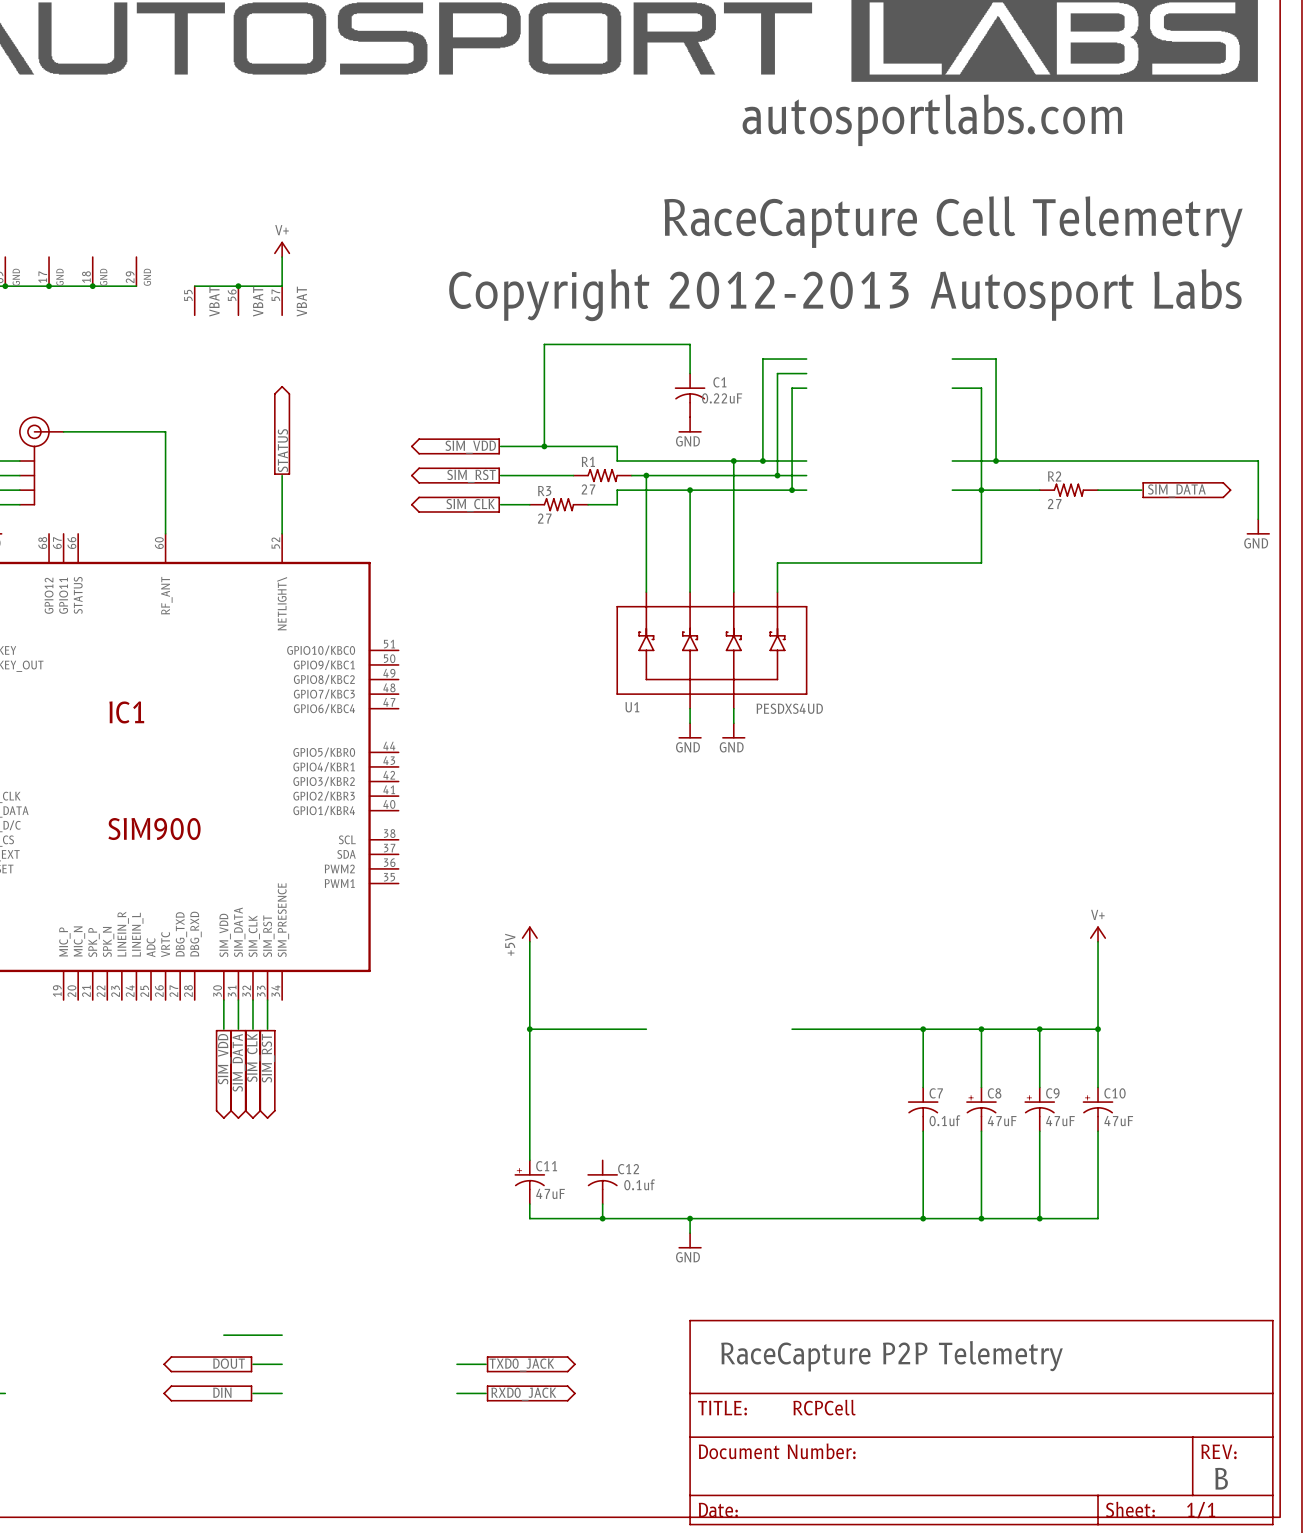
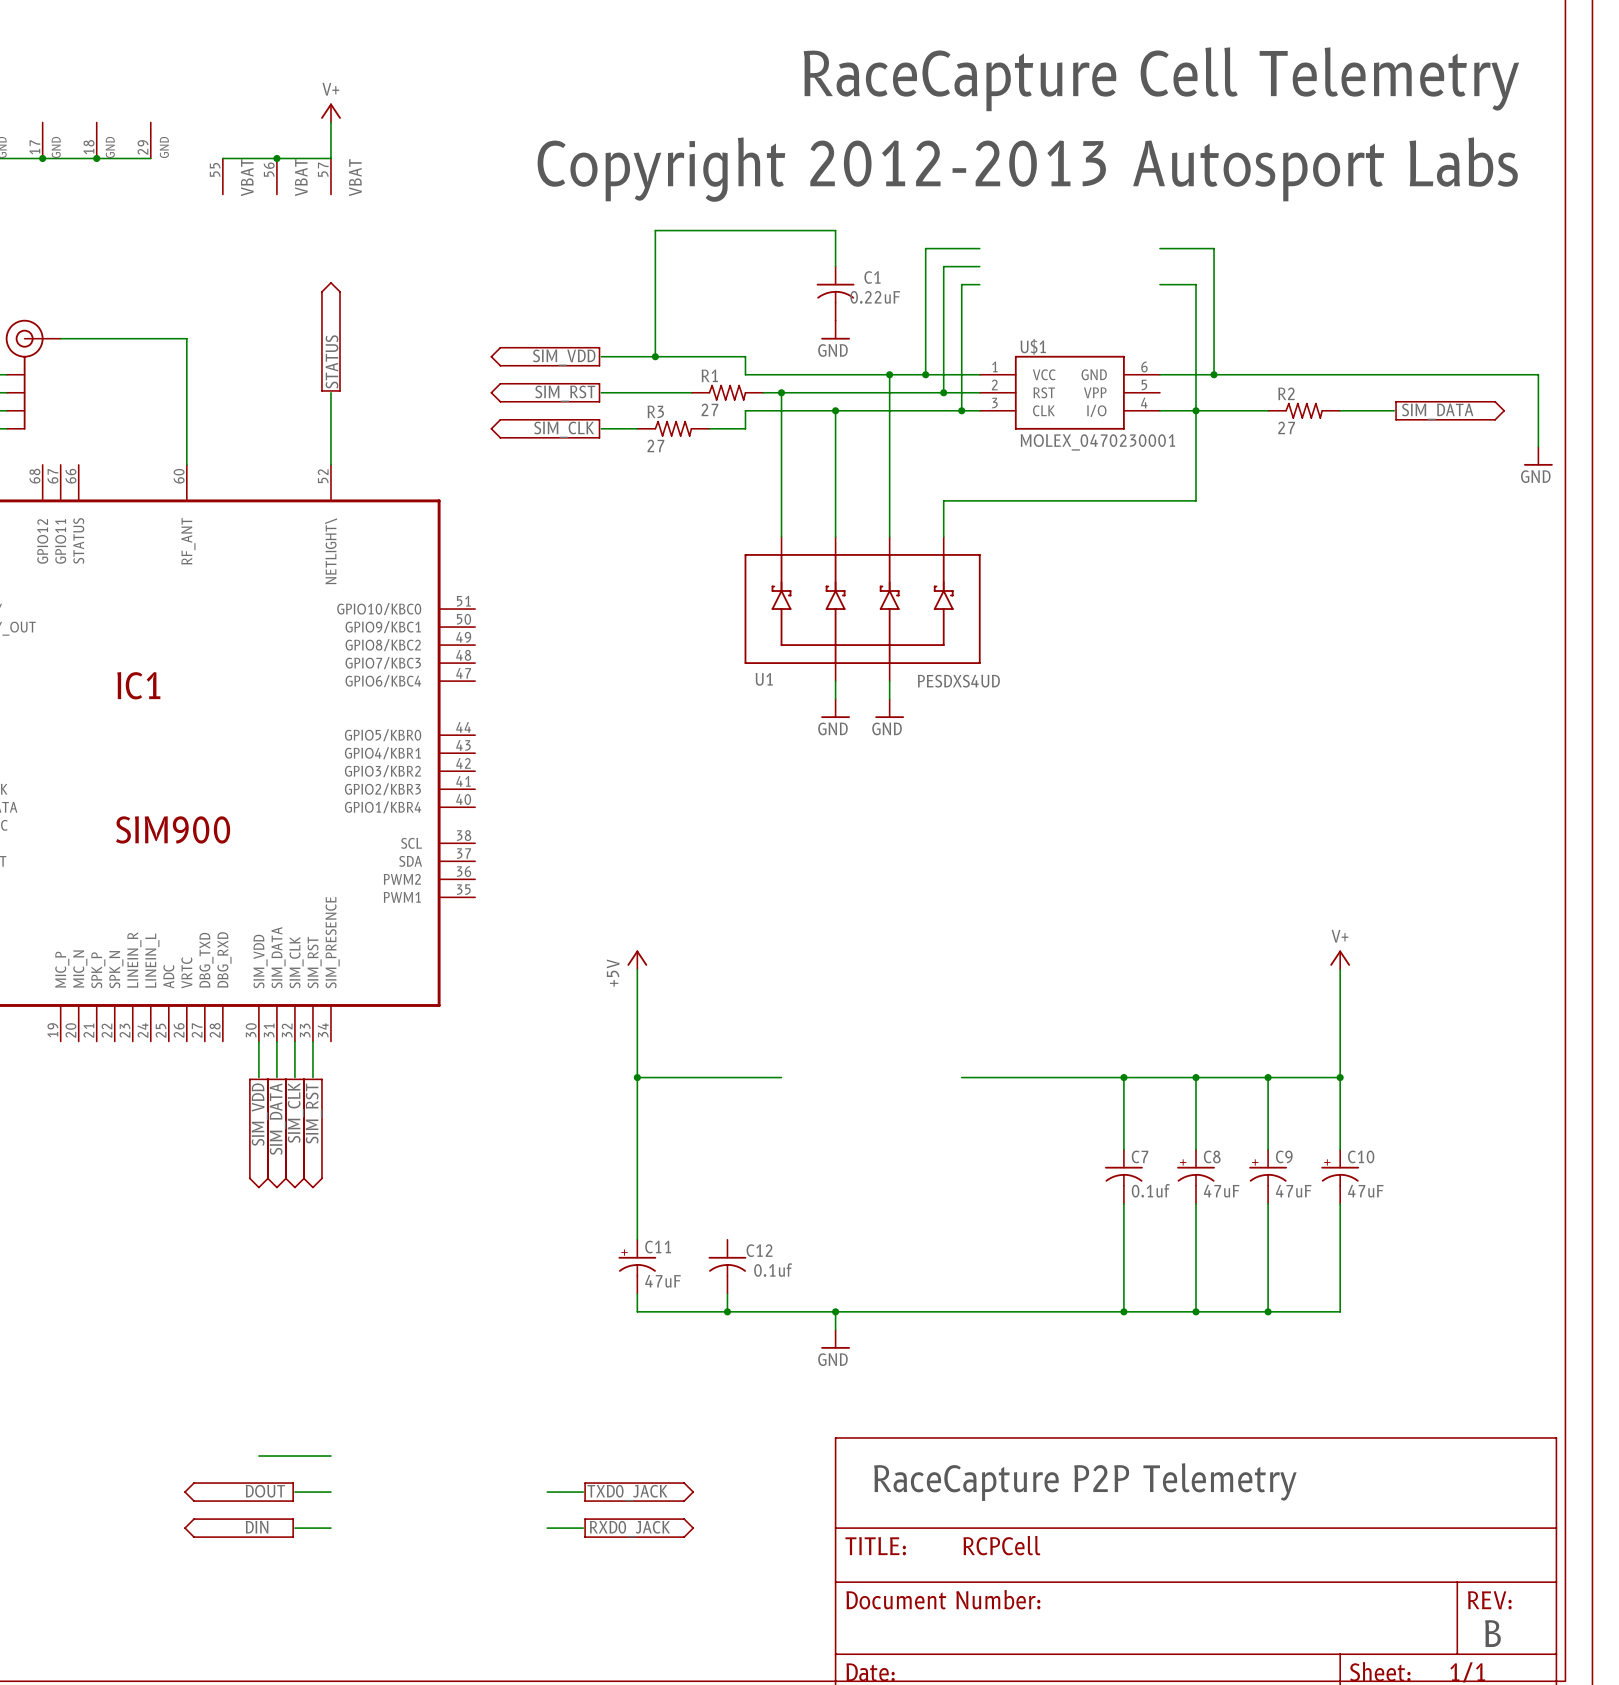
U$1: none -> MOLEX_0470230001 (1069, 392)

